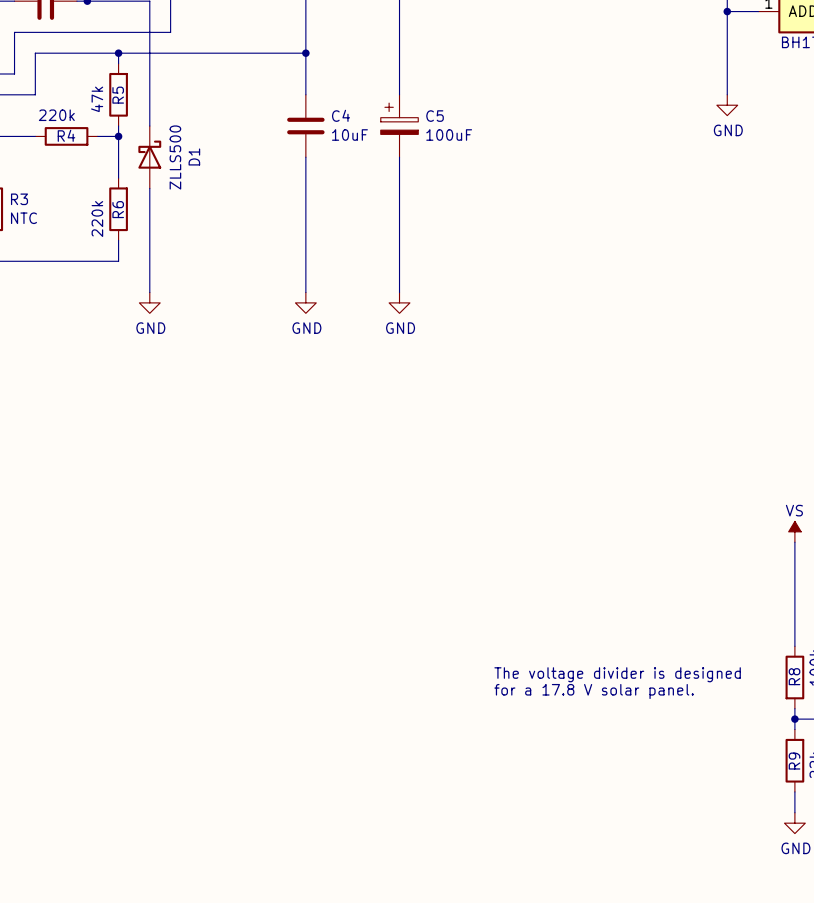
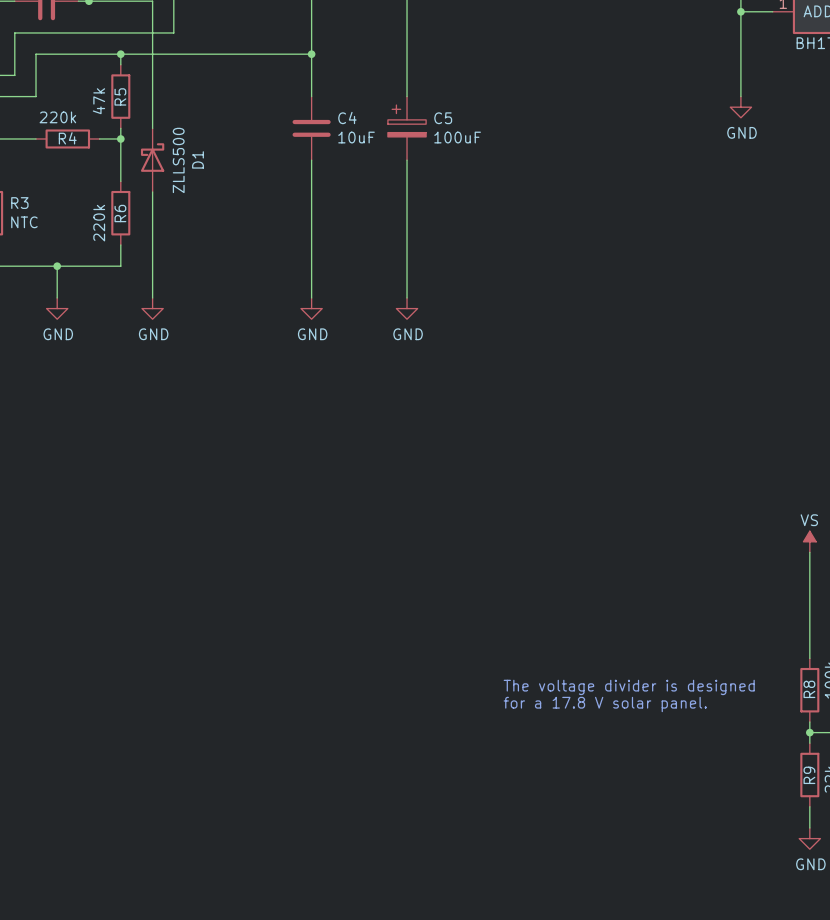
wire: none -> (57, 266) (57, 297)
junction: none -> (57, 266)
power symbol: none -> GND (57, 308)

